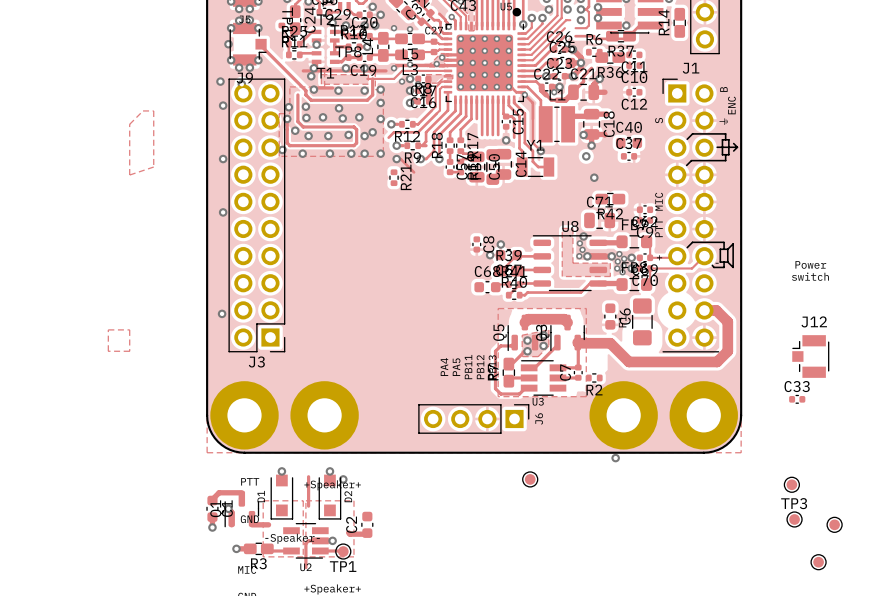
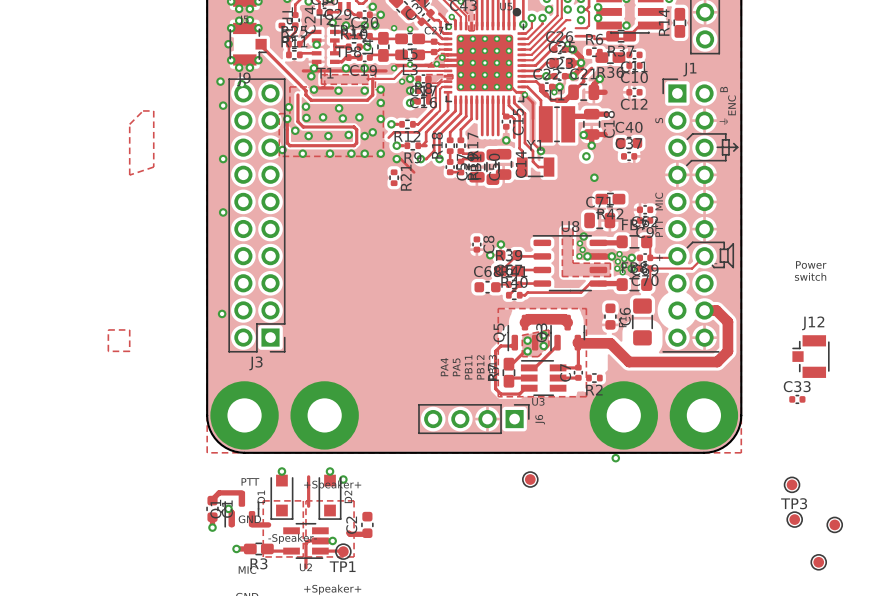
C24 footprint: [289, 5, 302, 36] -> [290, 12, 300, 29]

